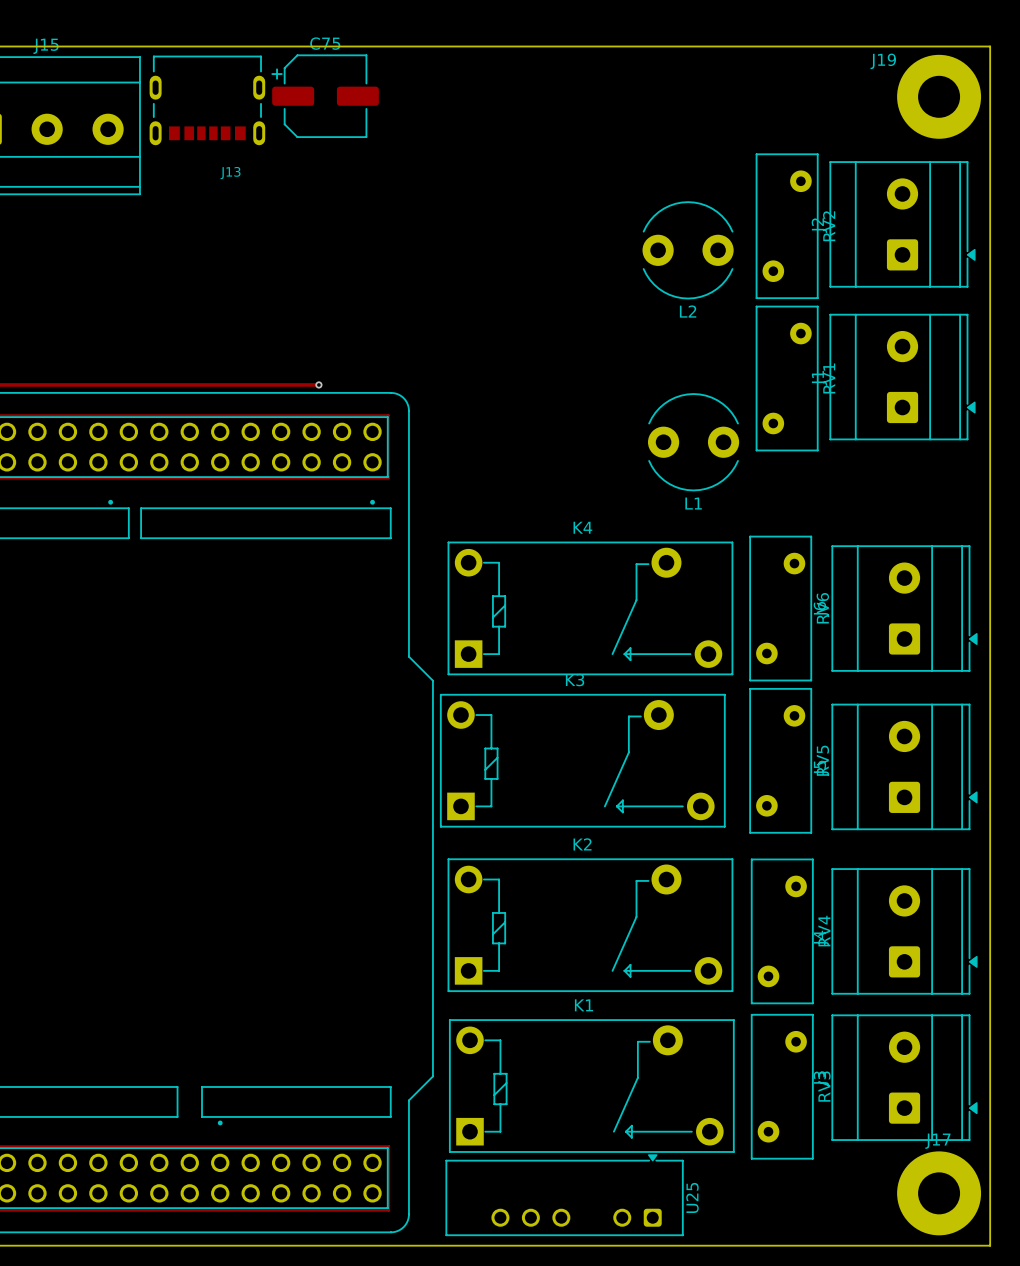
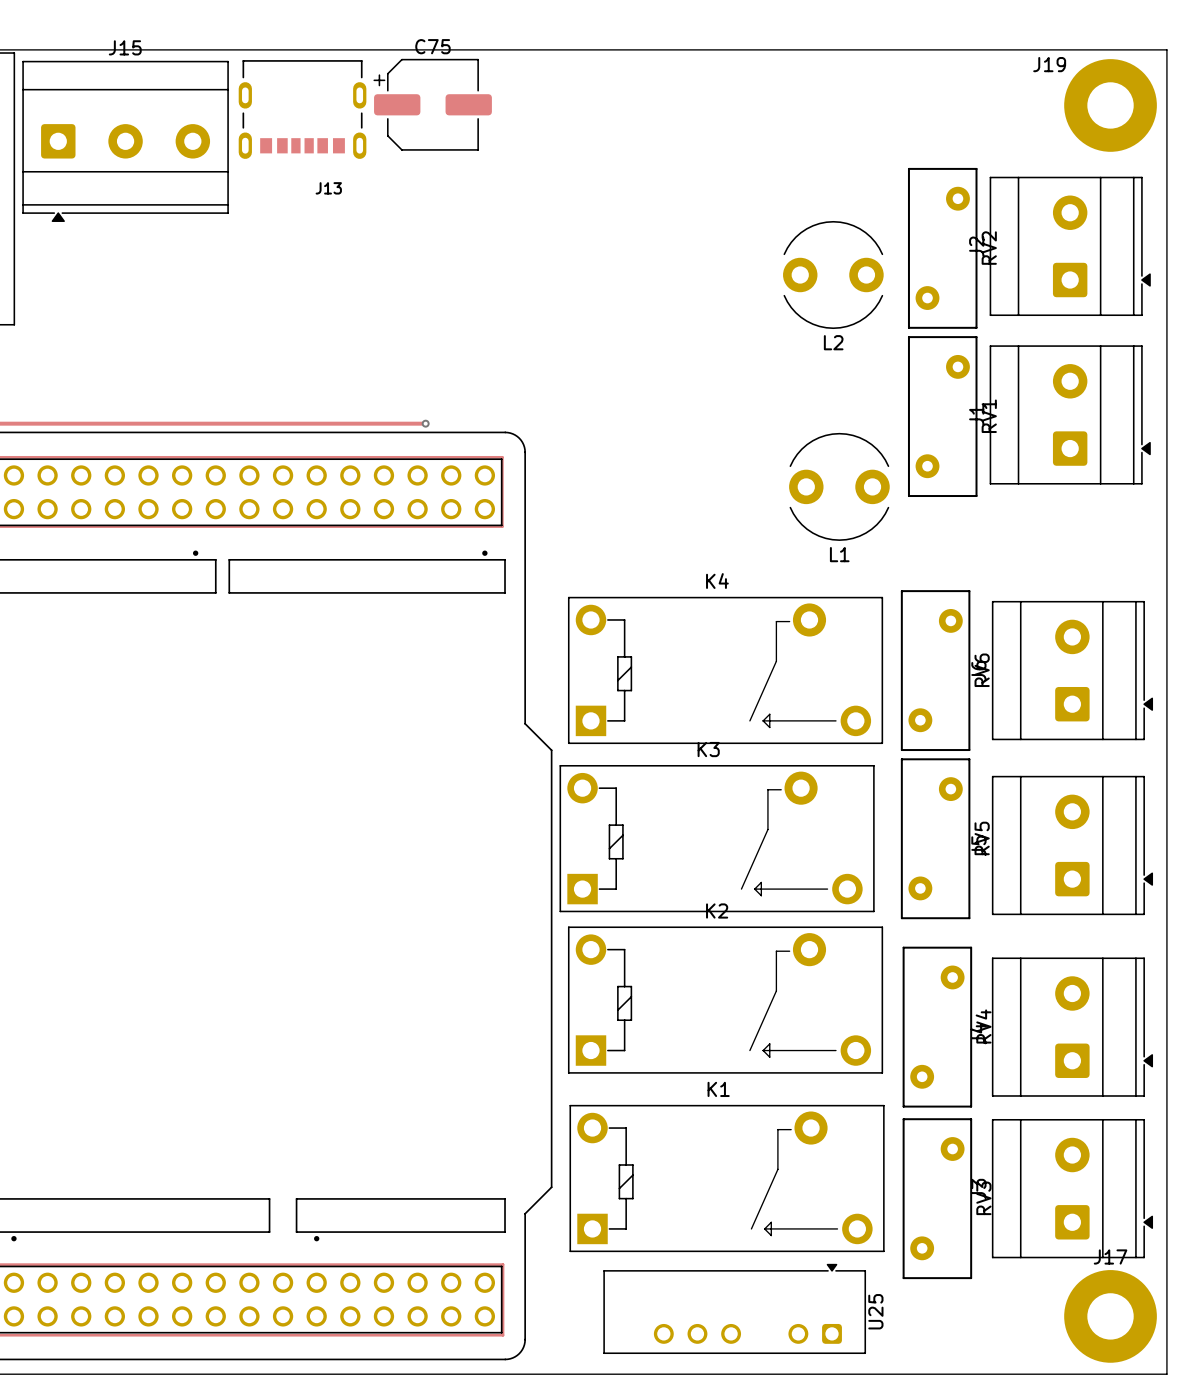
K2 position: (590, 925) -> (725, 1000)
K1 position: (591, 1086) -> (727, 1178)
U25 position: (564, 1195) -> (734, 1308)

